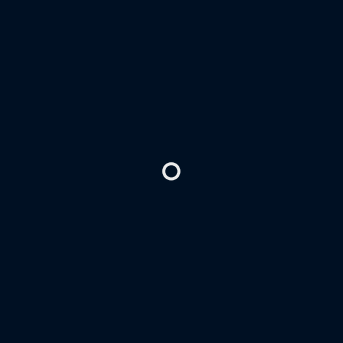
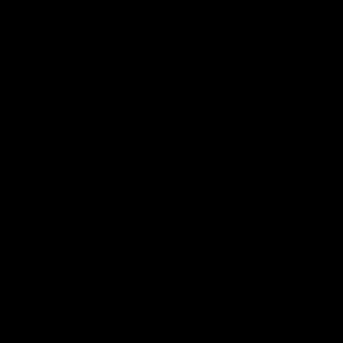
via: (171, 171) -> none

